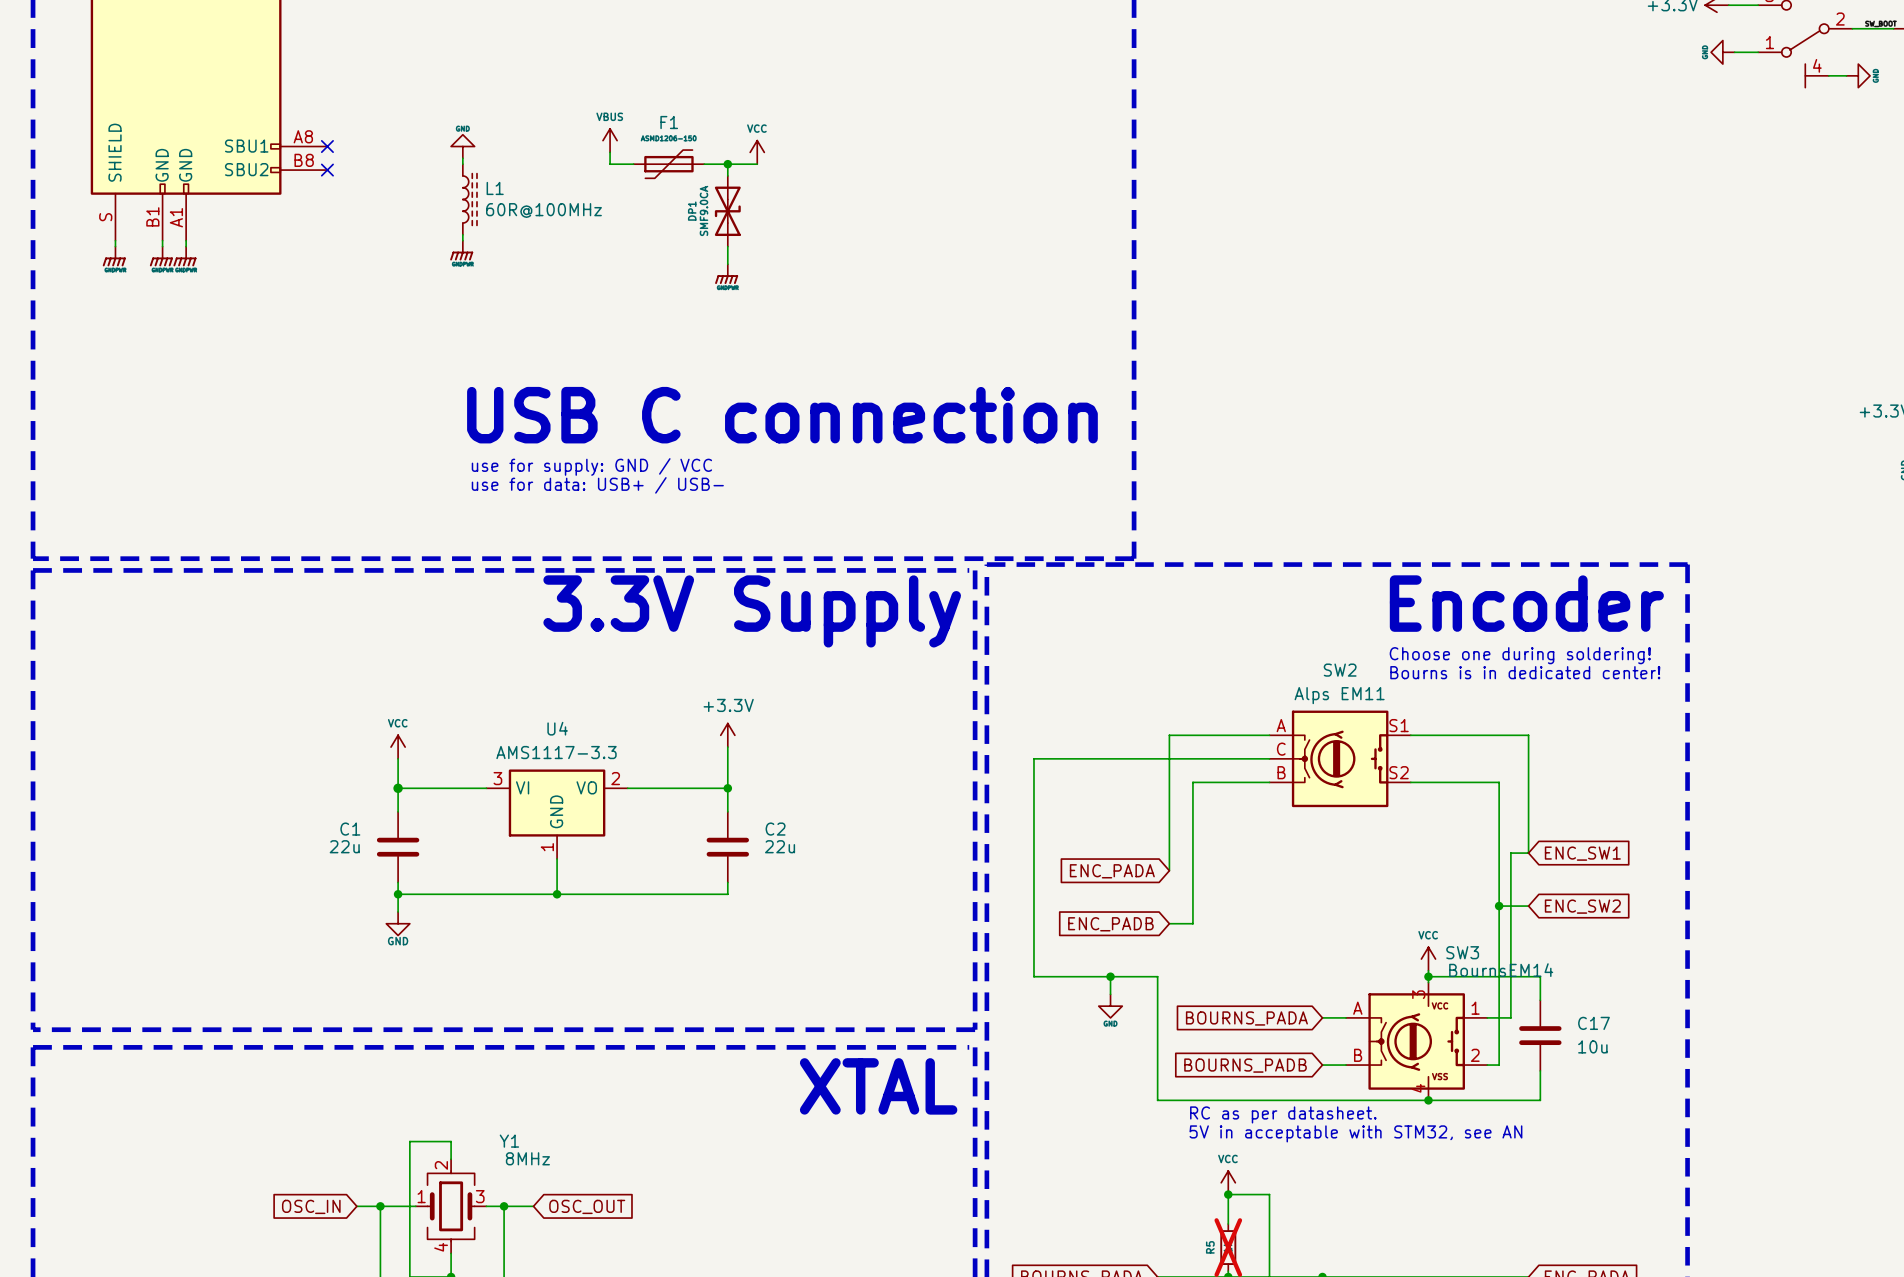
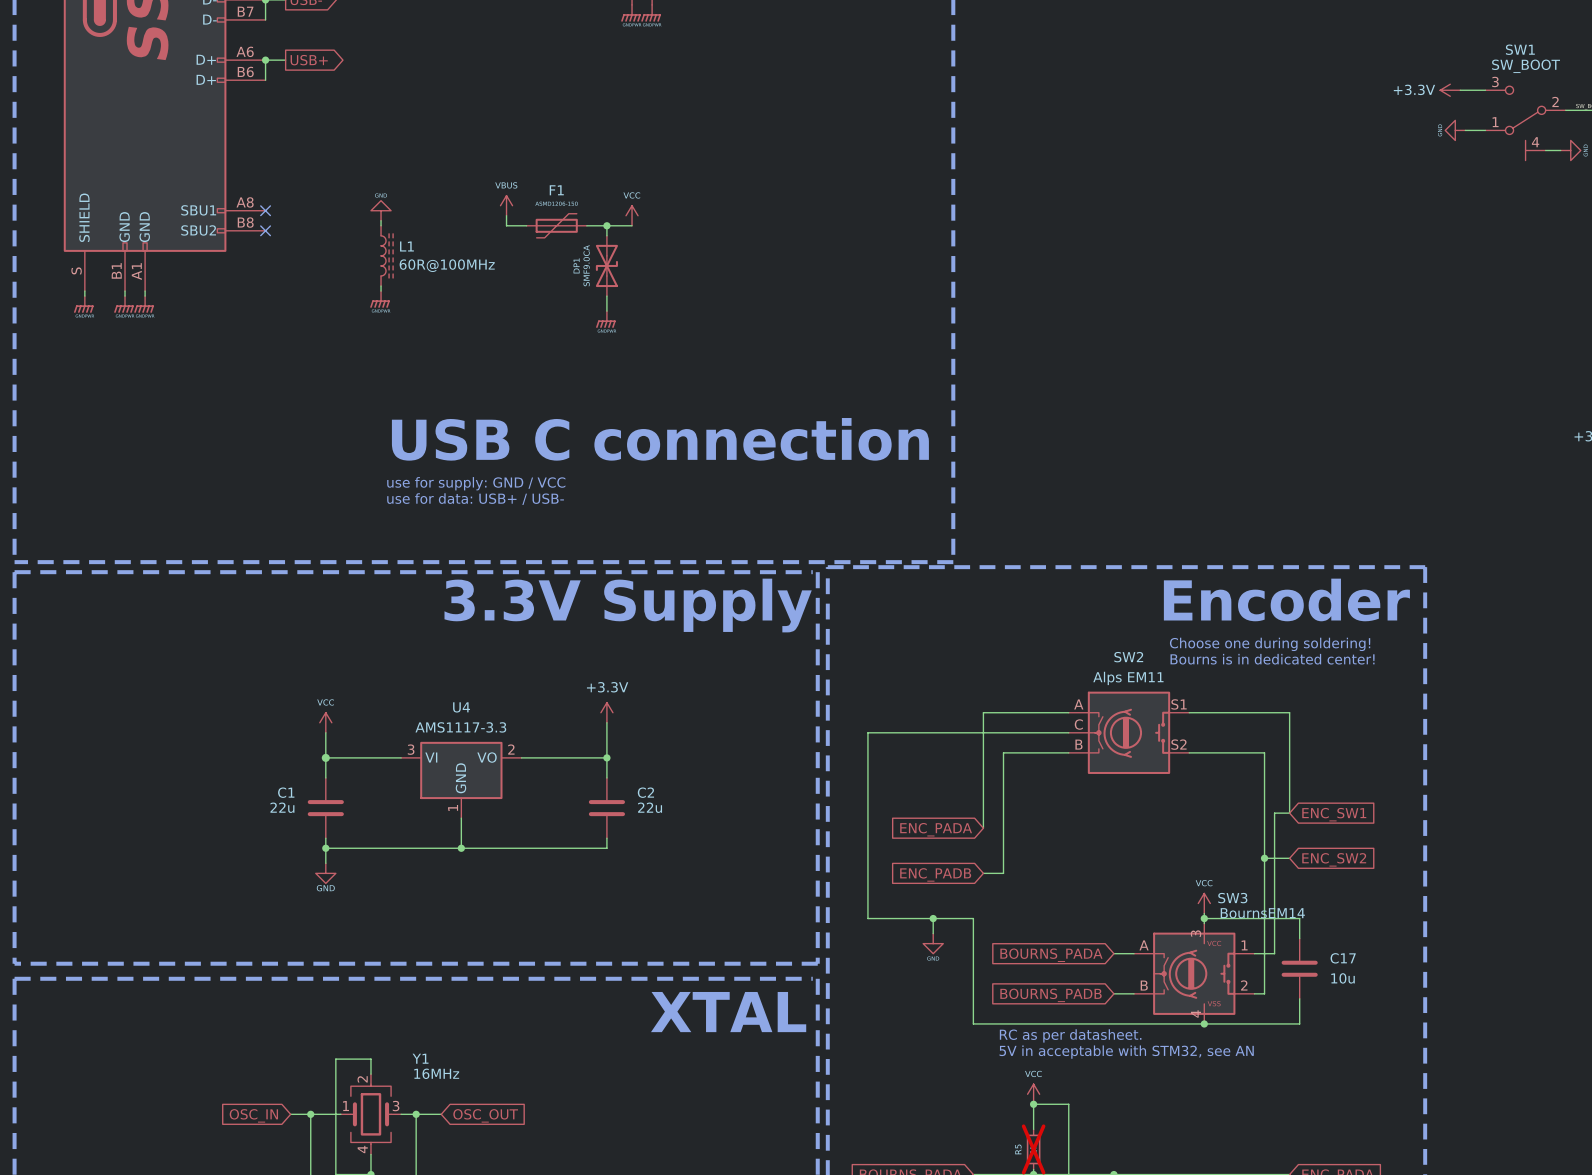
Y1 value: 8MHz (527, 1158) -> 16MHz (436, 1073)

